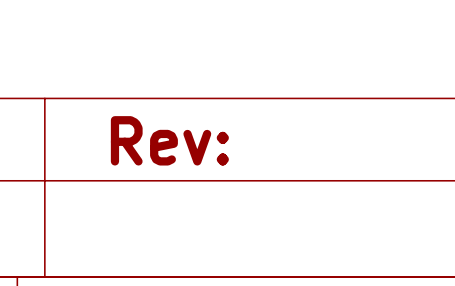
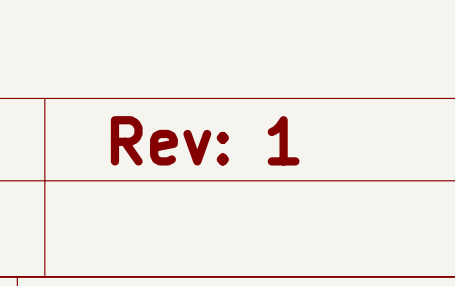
title block: Rev: (169, 140) -> Rev: 1 (205, 140)

